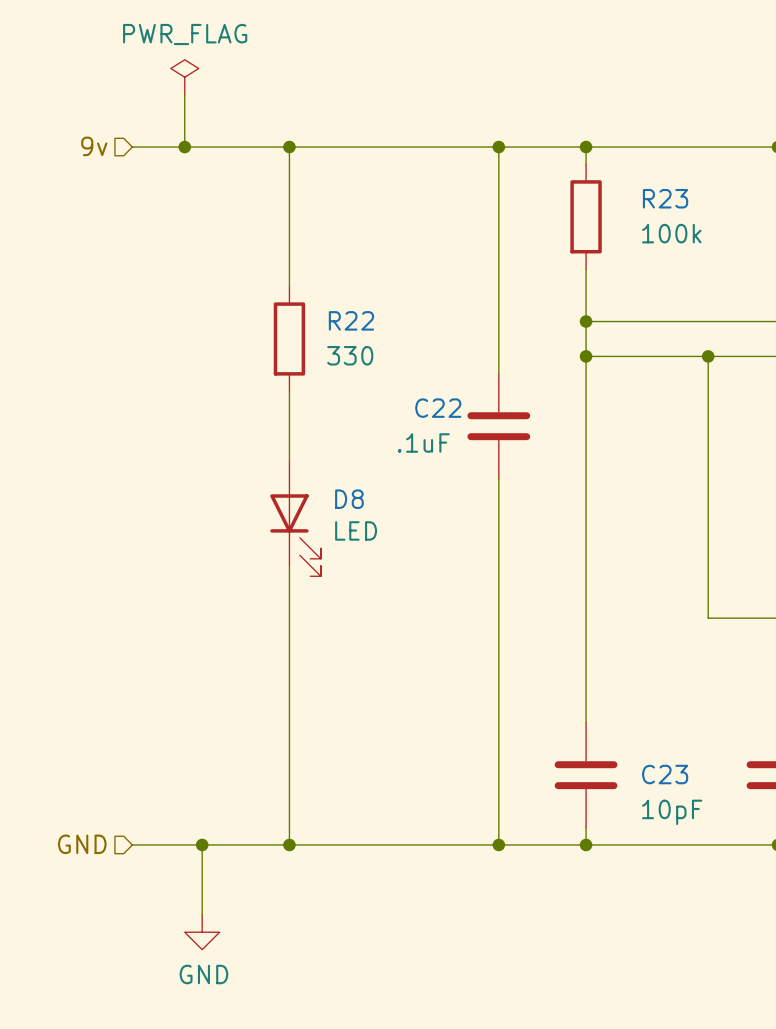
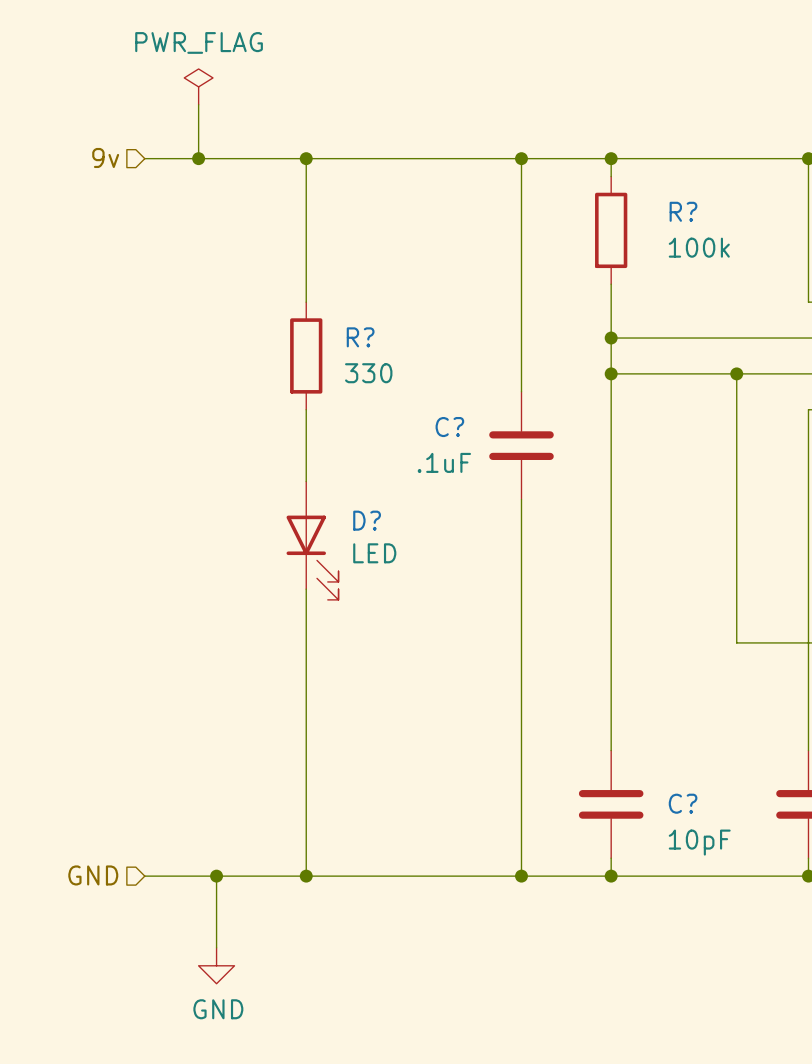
R23 name: R23 (665, 198) -> R? (683, 211)
R22 name: R22 (351, 320) -> R? (360, 337)
C22 name: C22 (438, 408) -> C? (449, 427)
D8 name: D8 (349, 499) -> D? (367, 520)
C23 name: C23 (665, 774) -> C? (683, 803)

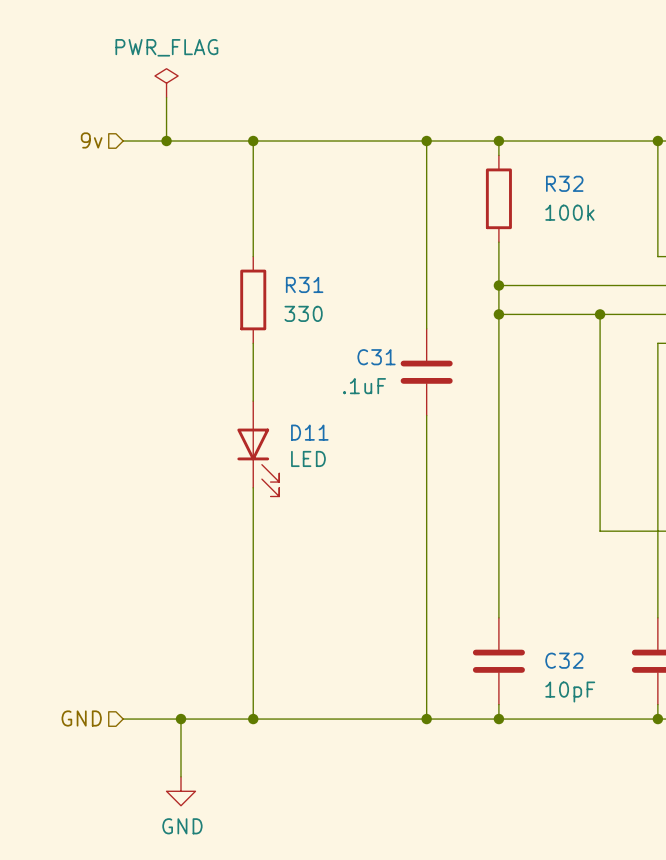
R? name: R? (683, 211) -> R32 (564, 183)
R? name: R? (360, 337) -> R31 (304, 284)
C? name: C? (449, 427) -> C31 (376, 357)
D? name: D? (367, 520) -> D11 (309, 432)
C? name: C? (683, 803) -> C32 (564, 660)

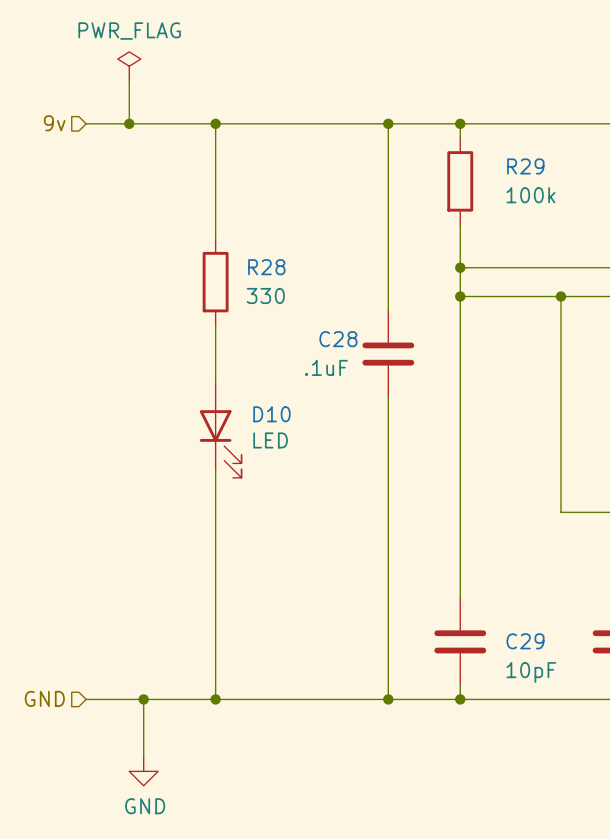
R32 name: R32 (564, 183) -> R29 (525, 166)
R31 name: R31 (304, 284) -> R28 (266, 267)
C31 name: C31 (376, 357) -> C28 (338, 339)
D11 name: D11 (309, 432) -> D10 (271, 414)
C32 name: C32 (564, 660) -> C29 (525, 641)

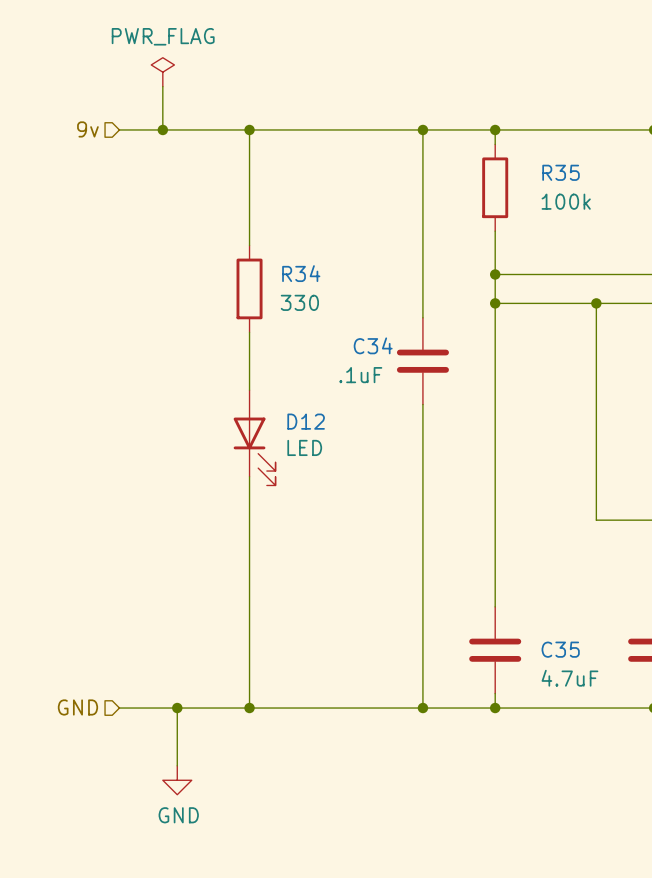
R29 name: R29 (525, 166) -> R35 (561, 172)
R28 name: R28 (266, 267) -> R34 (301, 273)
C28 name: C28 (338, 339) -> C34 (373, 345)
D10 name: D10 (271, 414) -> D12 (306, 421)
C29 name: C29 (525, 641) -> C35 (560, 649)
C29 value: 10pF (531, 672) -> 4.7uF (569, 678)

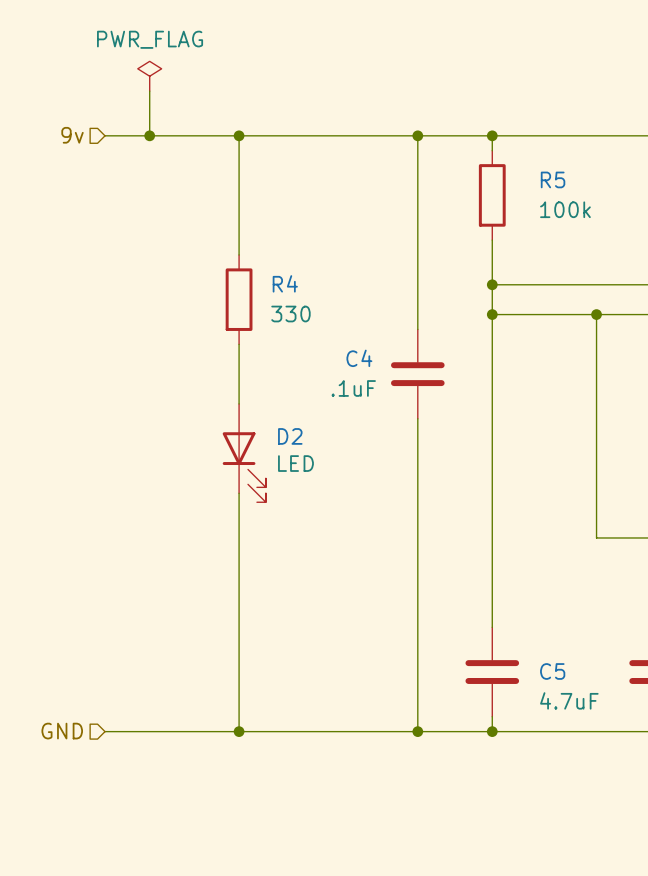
R35 name: R35 (561, 172) -> R5 (553, 179)
R34 name: R34 (301, 273) -> R4 (285, 283)
C34 name: C34 (373, 345) -> C4 (359, 358)
D12 name: D12 (306, 421) -> D2 (290, 436)
C35 name: C35 (560, 649) -> C5 (552, 671)
wire: (177, 708) (177, 765) -> none
junction: (177, 708) -> none
power symbol: GND (177, 780) -> none

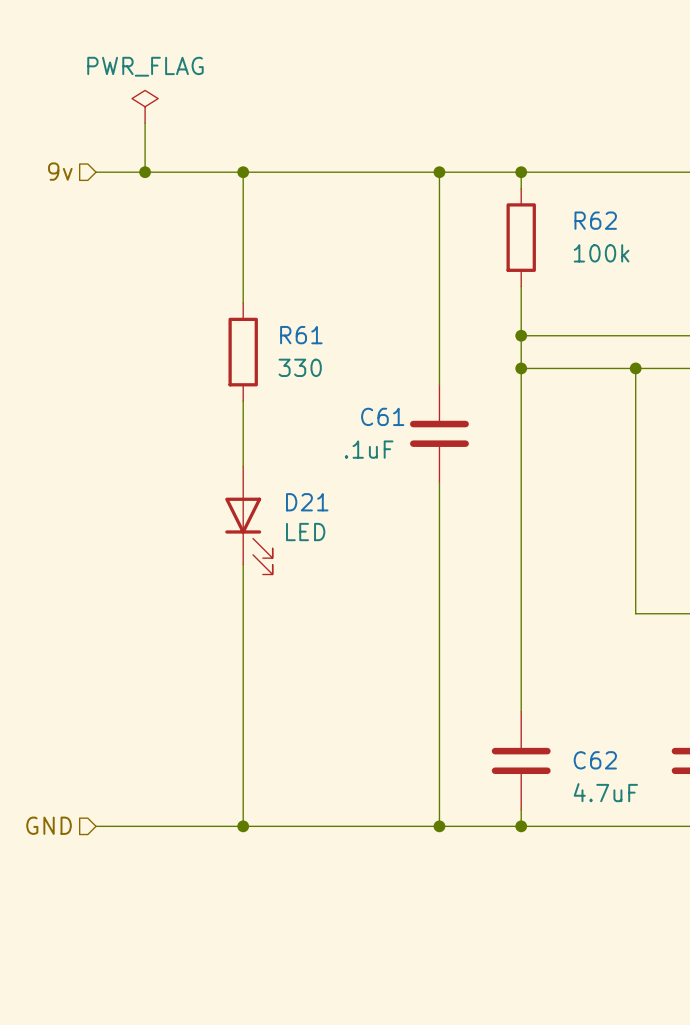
R5 name: R5 (553, 179) -> R62 (595, 220)
R4 name: R4 (285, 283) -> R61 (301, 335)
C4 name: C4 (359, 358) -> C61 (382, 416)
D2 name: D2 (290, 436) -> D21 (307, 502)
C5 name: C5 (552, 671) -> C62 (595, 760)

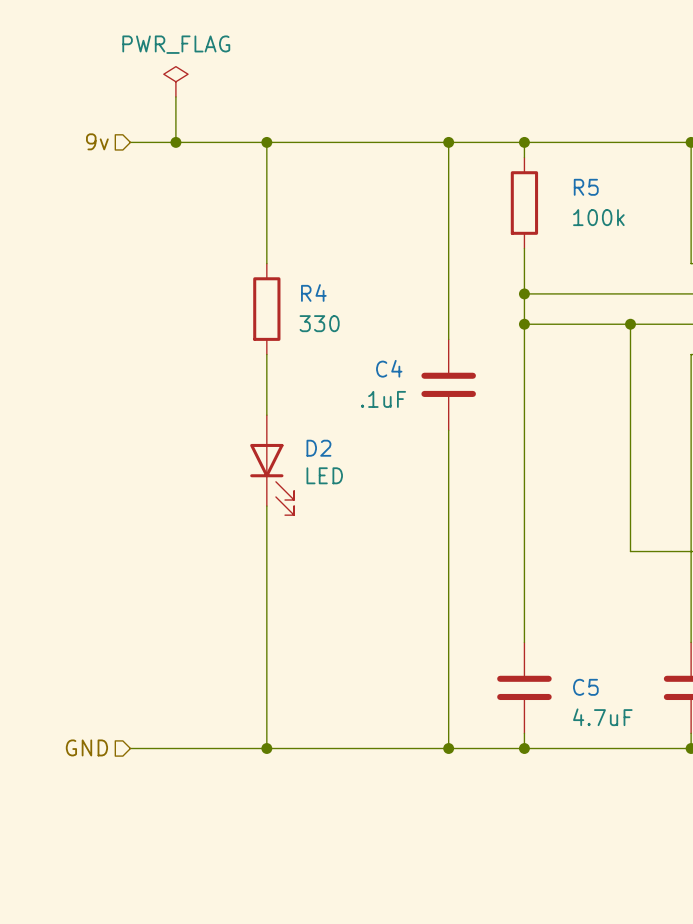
R62 name: R62 (595, 220) -> R5 (586, 187)
R61 name: R61 (301, 335) -> R4 (313, 293)
C61 name: C61 (382, 416) -> C4 (389, 368)
D21 name: D21 (307, 502) -> D2 (318, 448)
C62 name: C62 (595, 760) -> C5 (585, 687)

